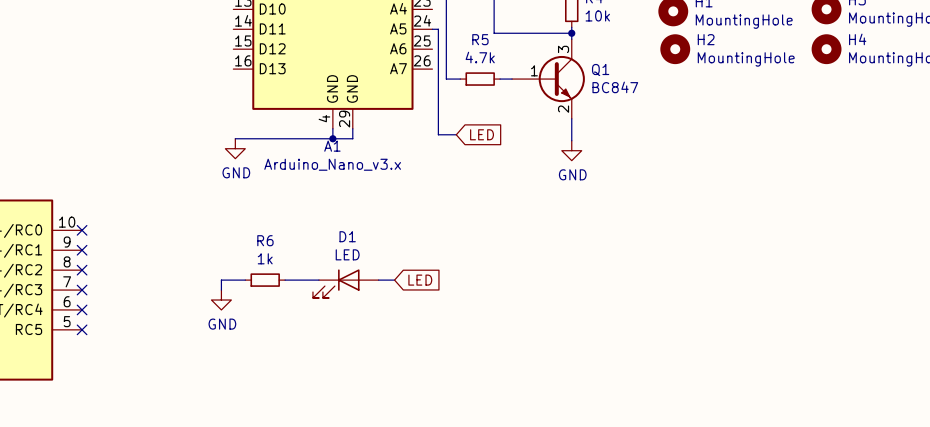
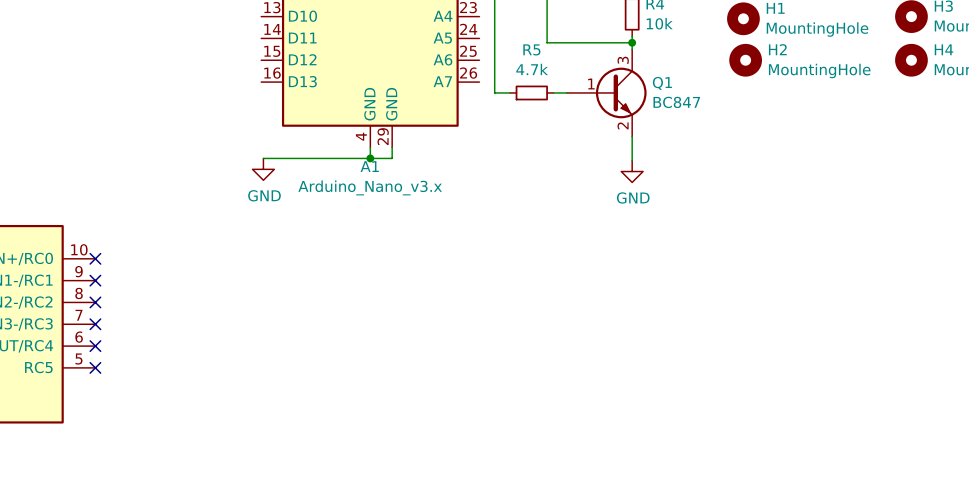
wire: (432, 29) (438, 29) (438, 134) (456, 134) -> none
global label: LED (482, 134) -> none
wire: (245, 280) (221, 280) (221, 290) -> none
R6: 1k (265, 280) -> none
wire: (285, 280) (318, 280) -> none
wire: (378, 280) (394, 280) -> none
global label: LED (420, 280) -> none
D1: LED (345, 283) -> none
power symbol: GND (221, 300) -> none

